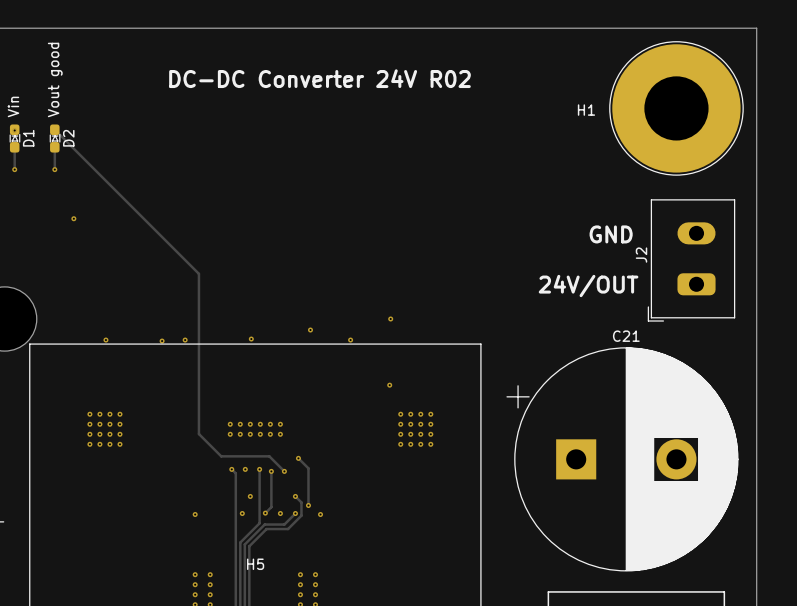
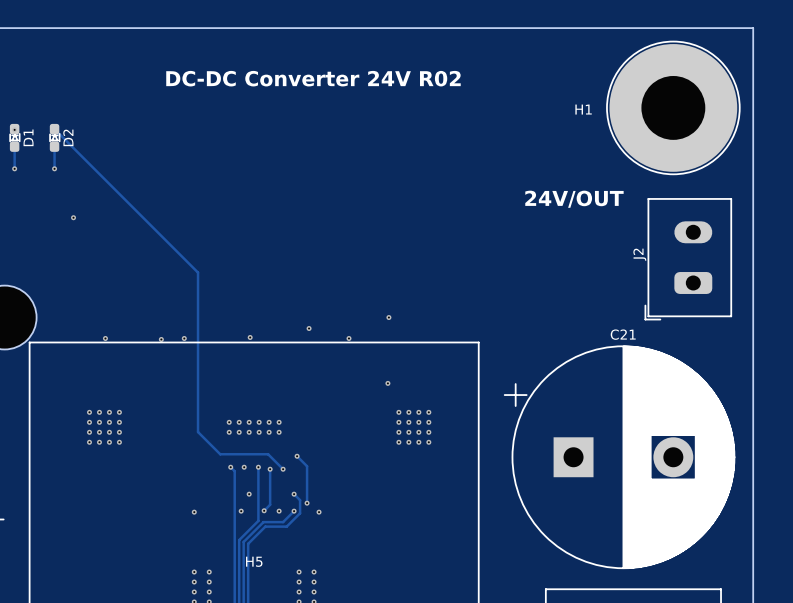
text: Vout good (55, 79) -> none
text: Vin (13, 106) -> none
text: GND (611, 234) -> none
text position: 24V/OUT (588, 286) -> 24V/OUT (574, 199)

